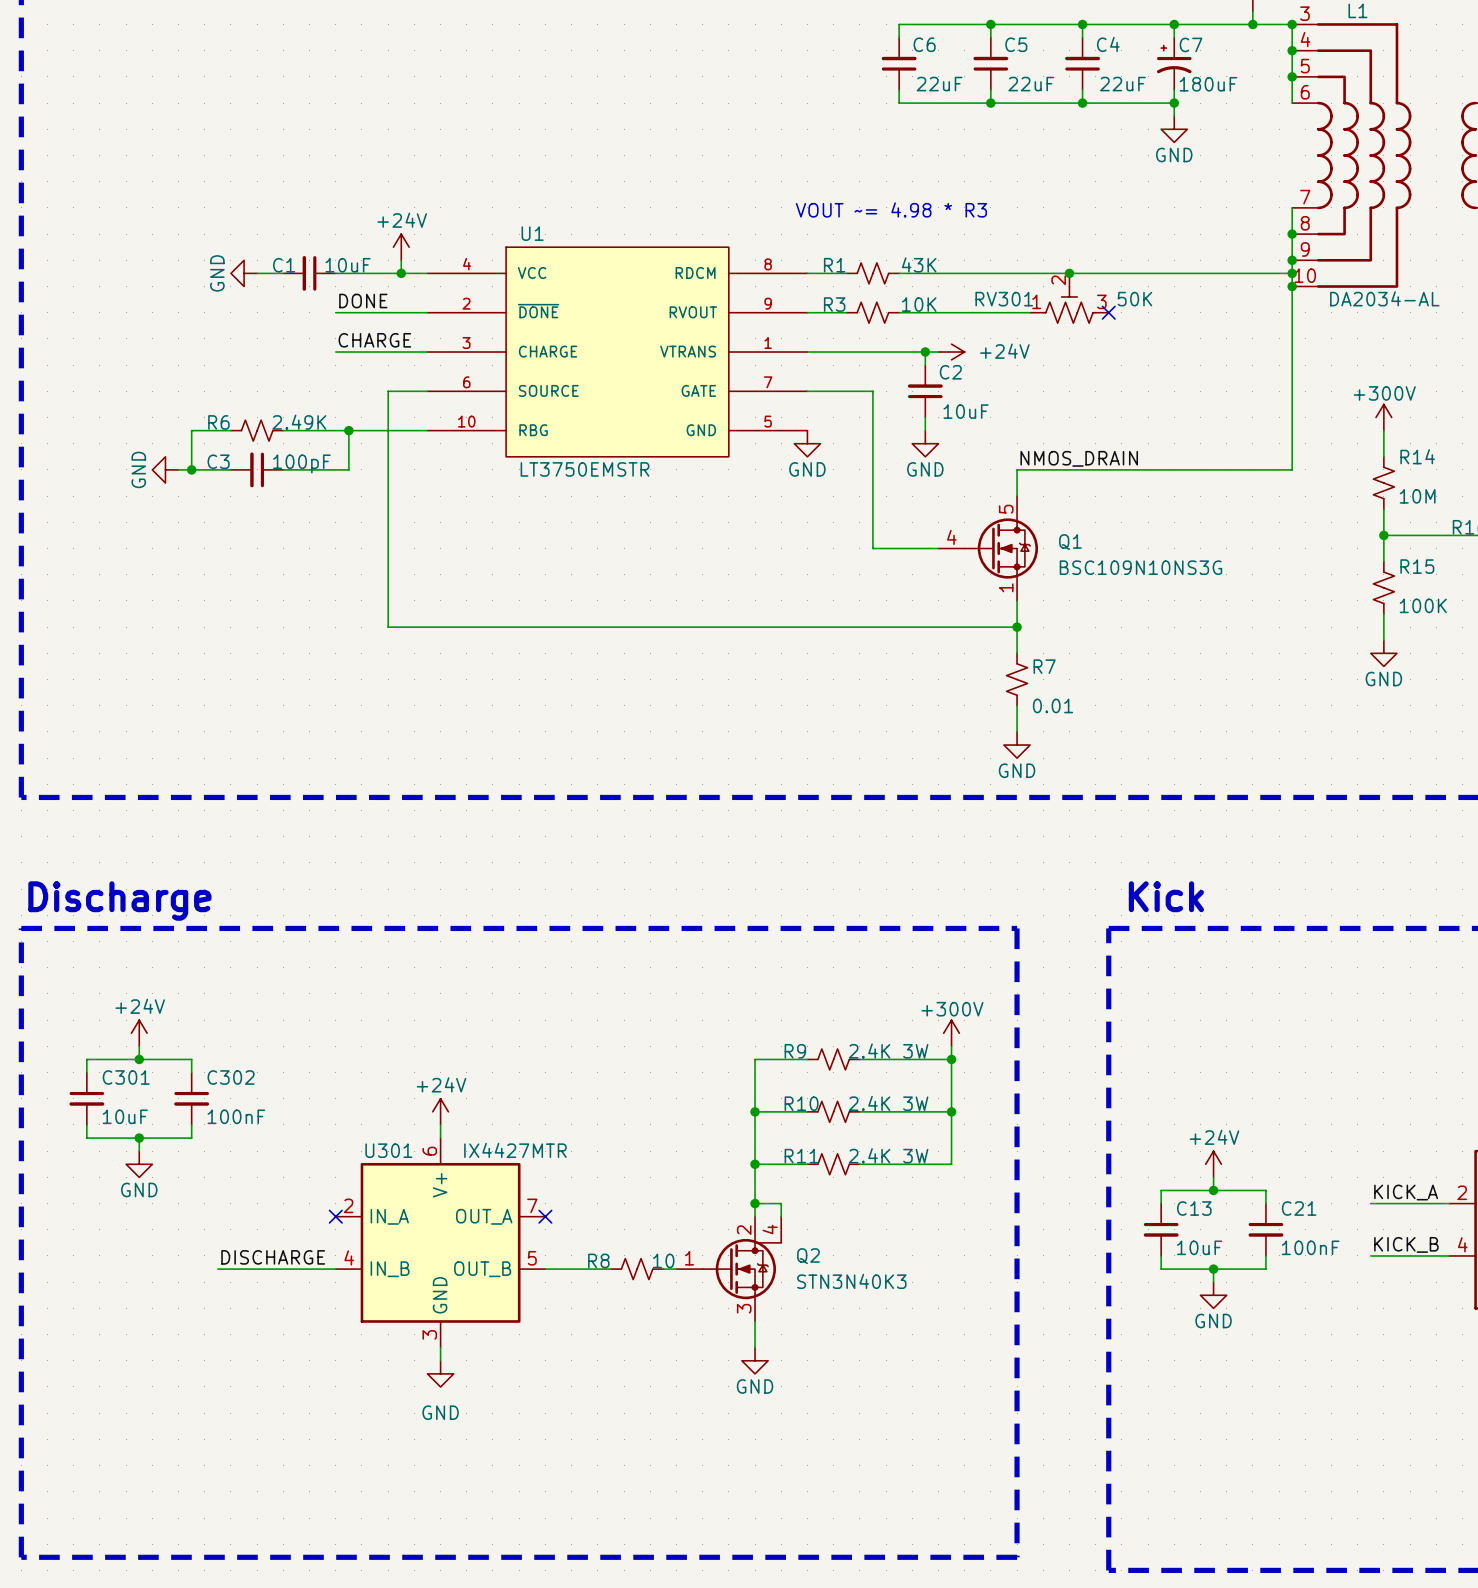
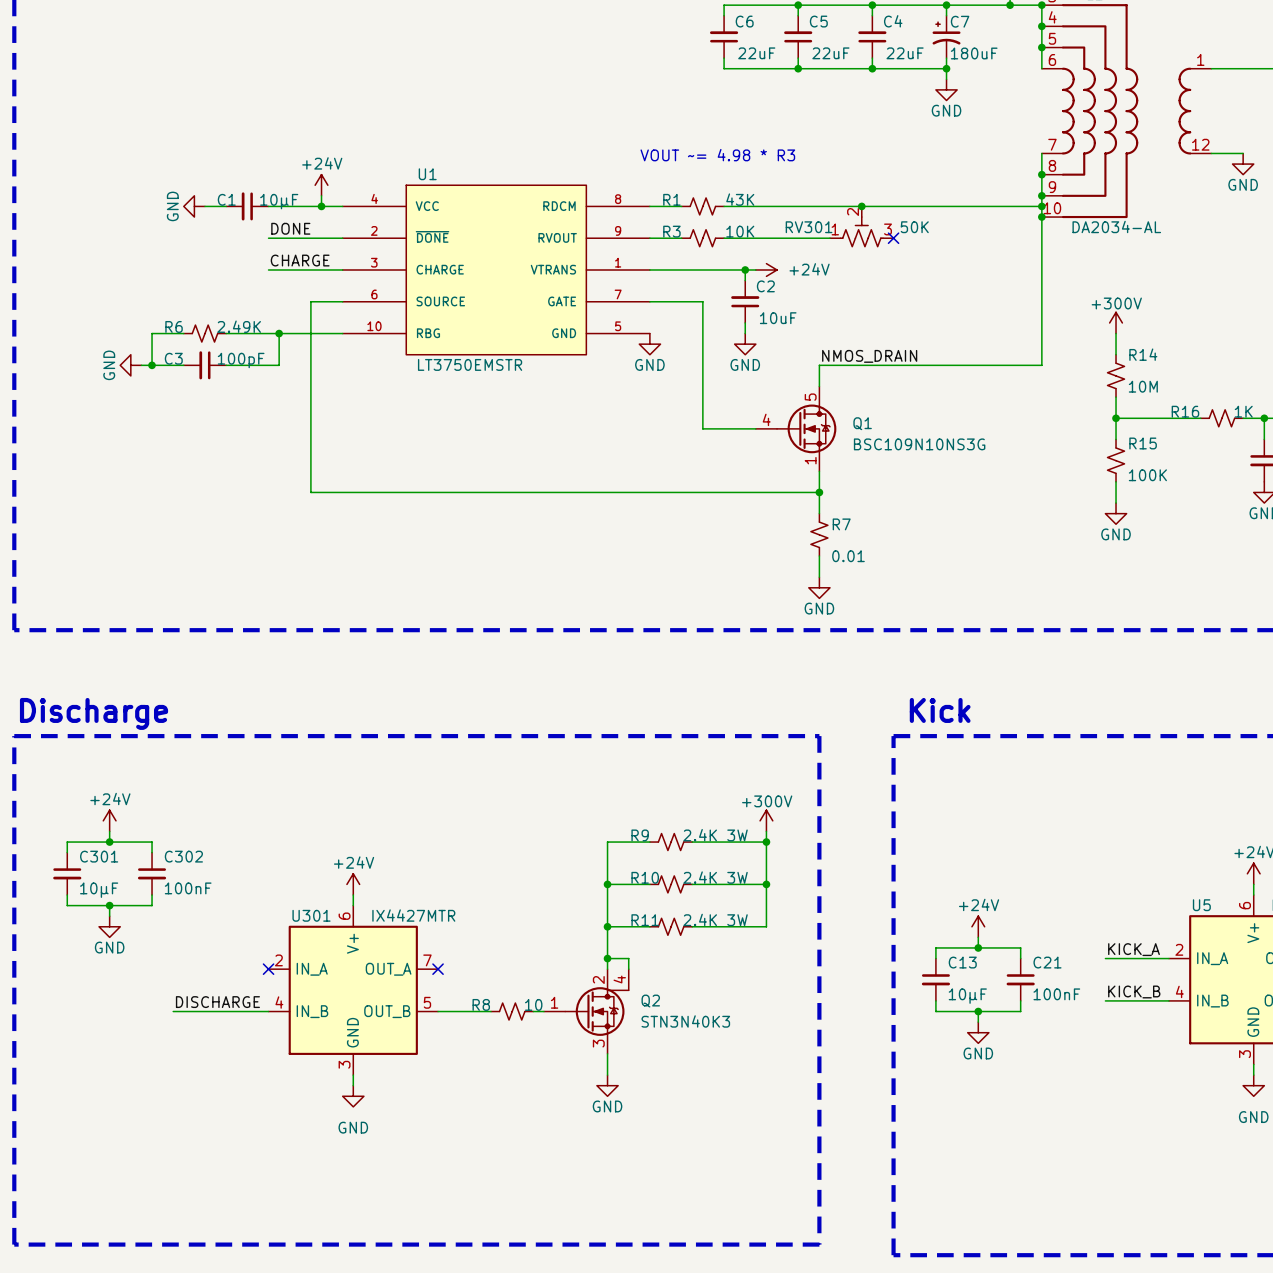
C1 value: 10uF (348, 265) -> 10µF (279, 201)
C301 value: 10uF (125, 1116) -> 10µF (99, 890)
C13 value: 10uF (1199, 1247) -> 10µF (967, 996)

